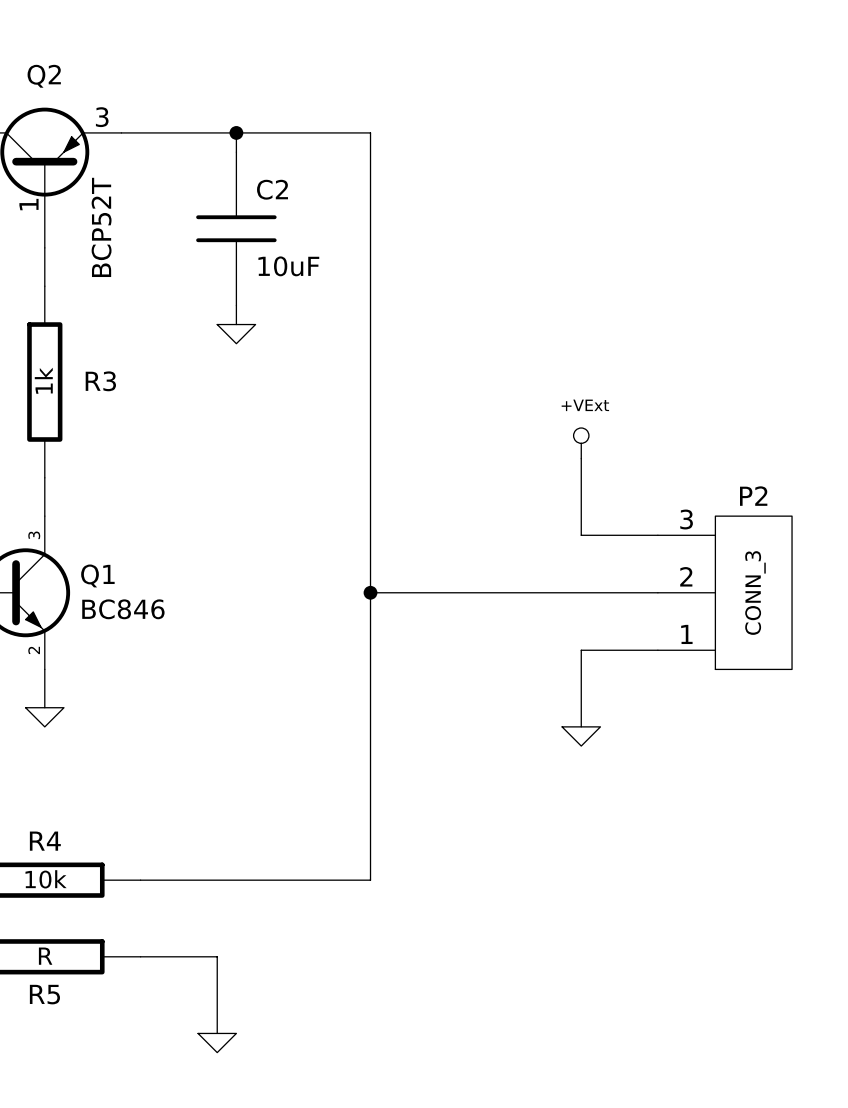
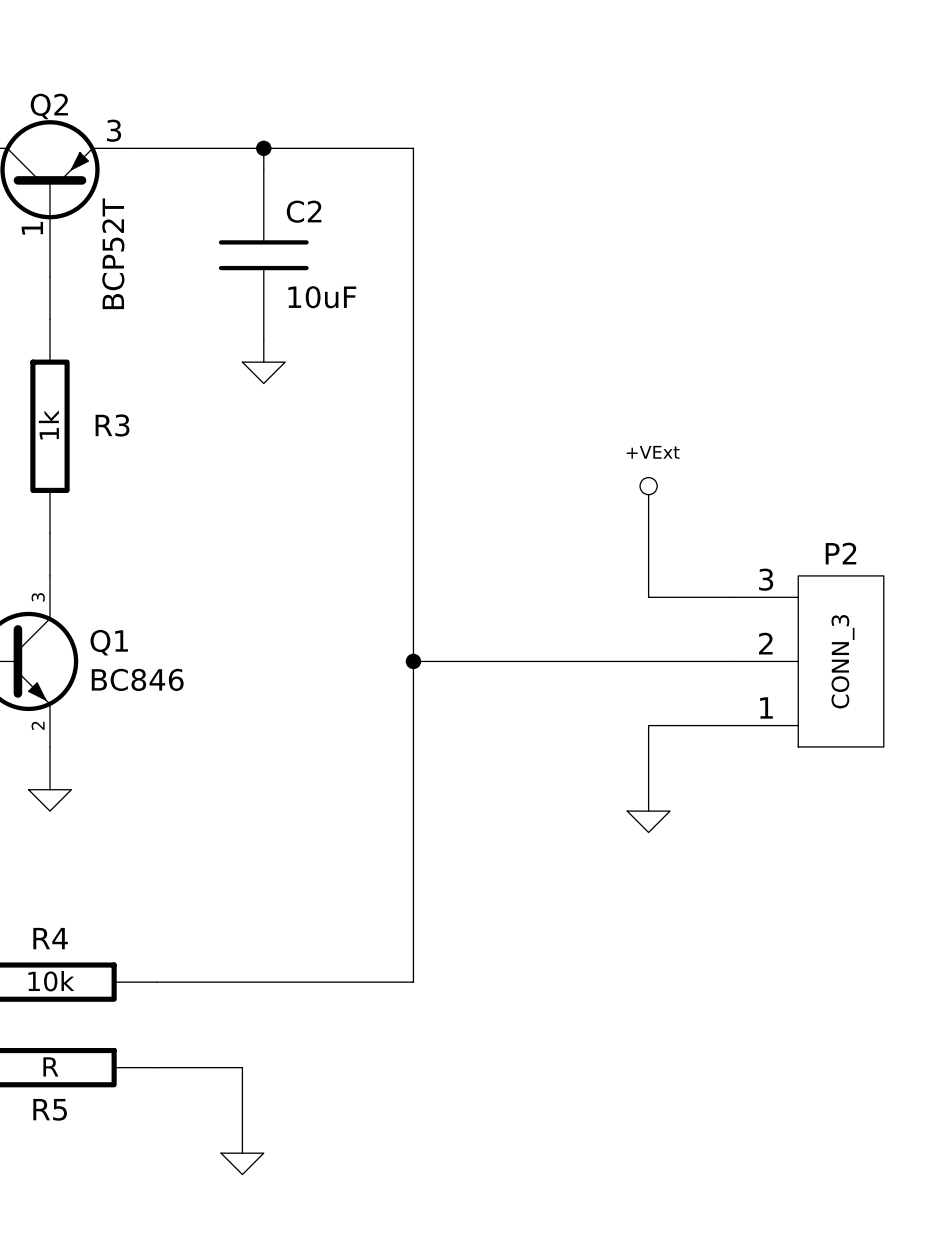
Q2 name position: Q2 (44, 76) -> Q2 (49, 106)

